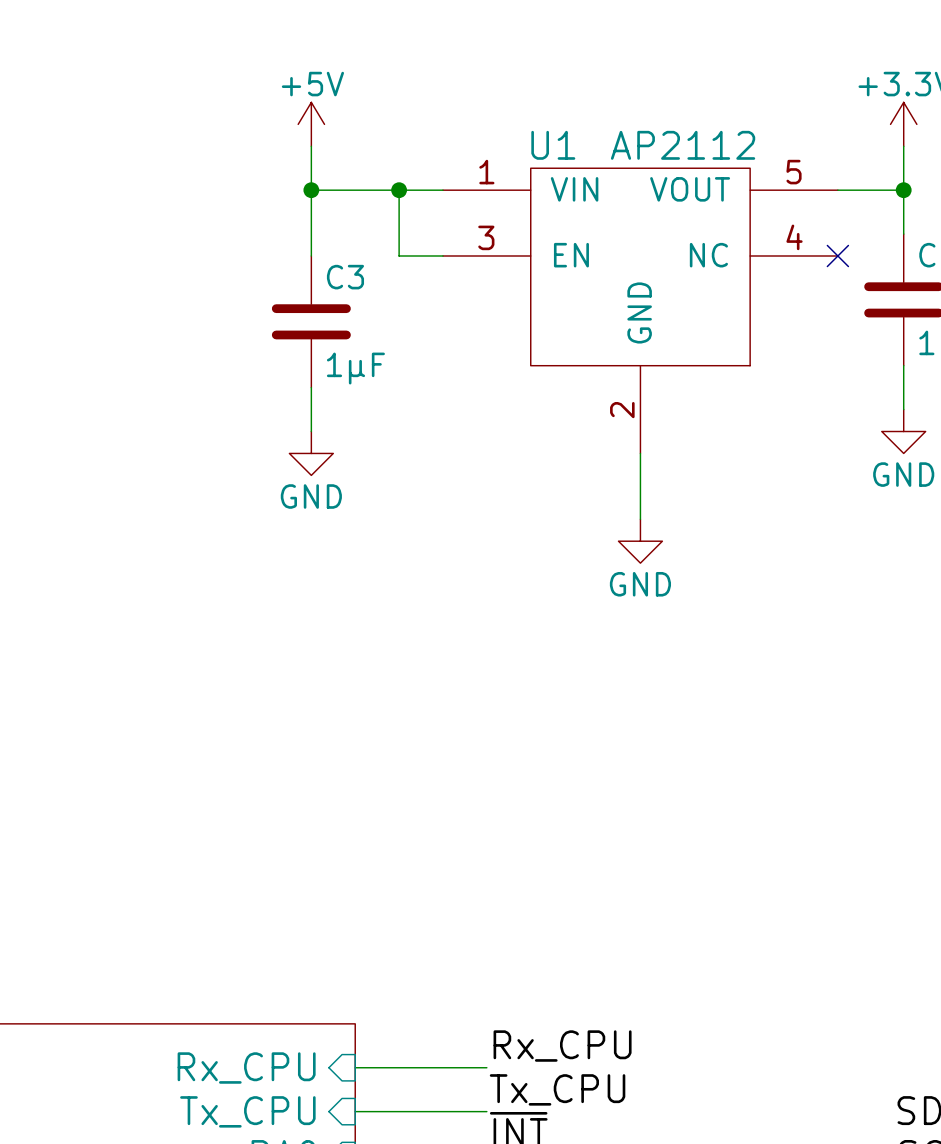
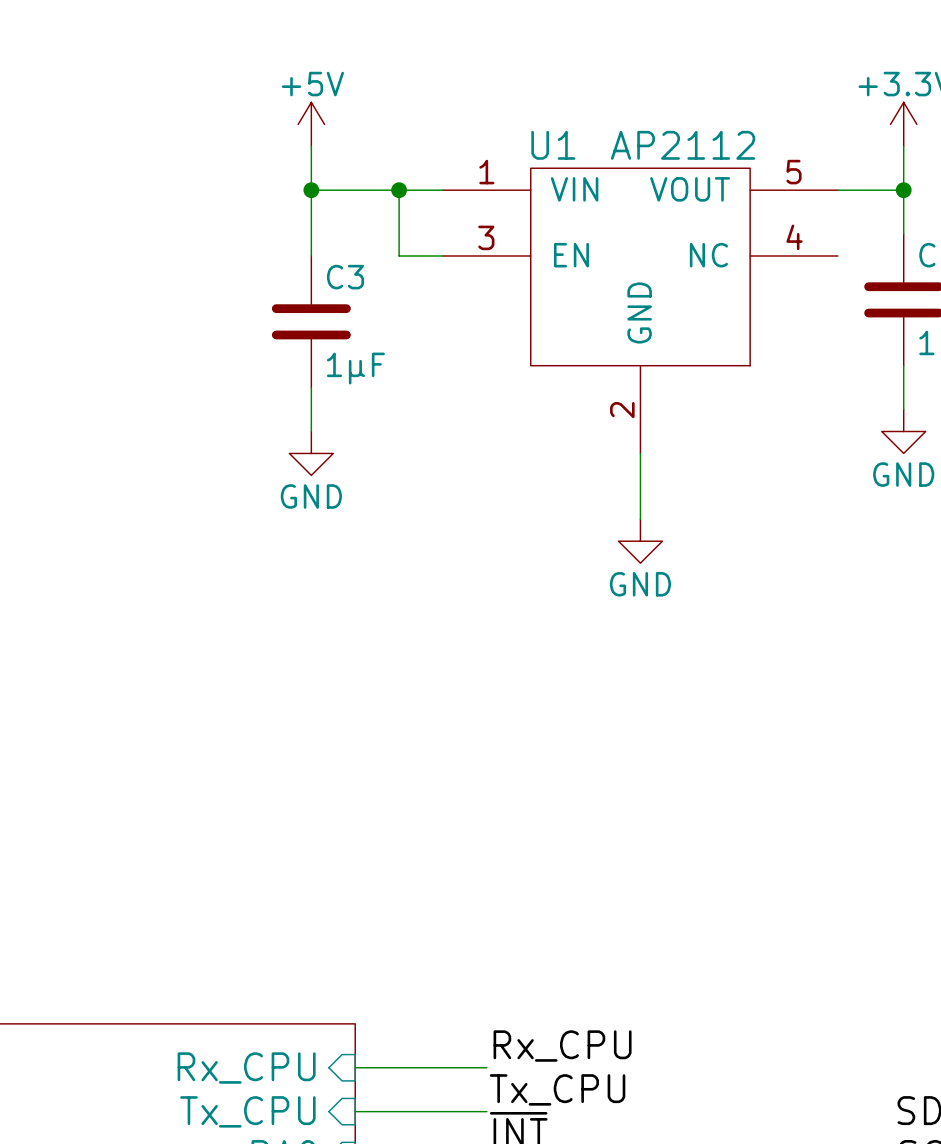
no-connect mark: (837, 256) -> none

